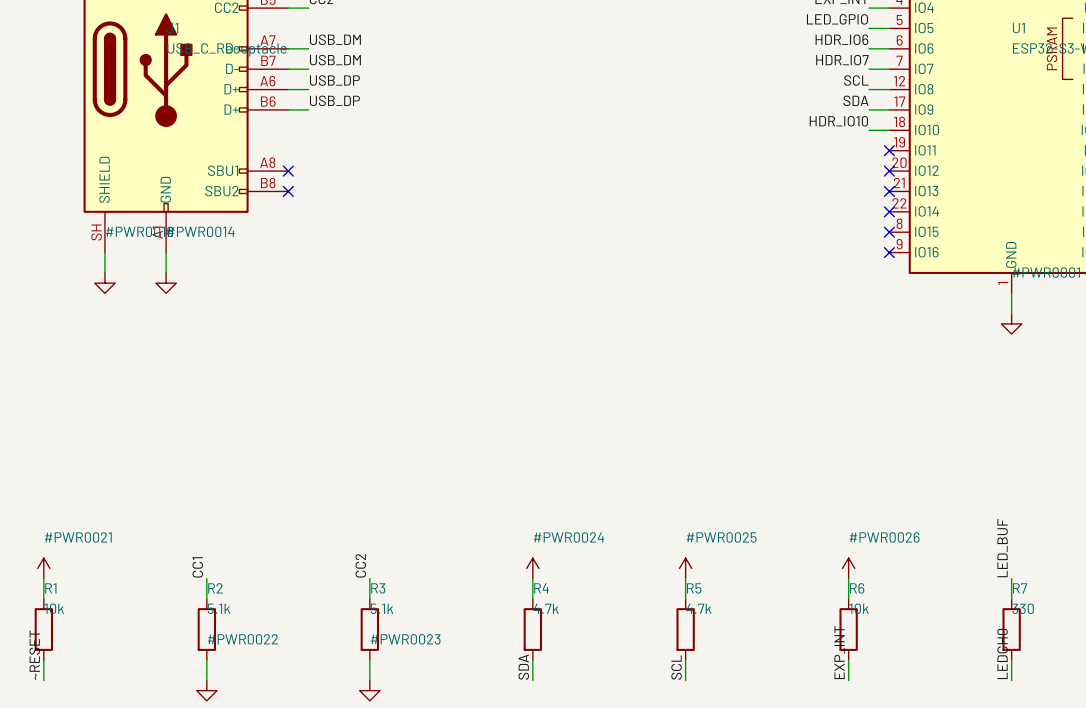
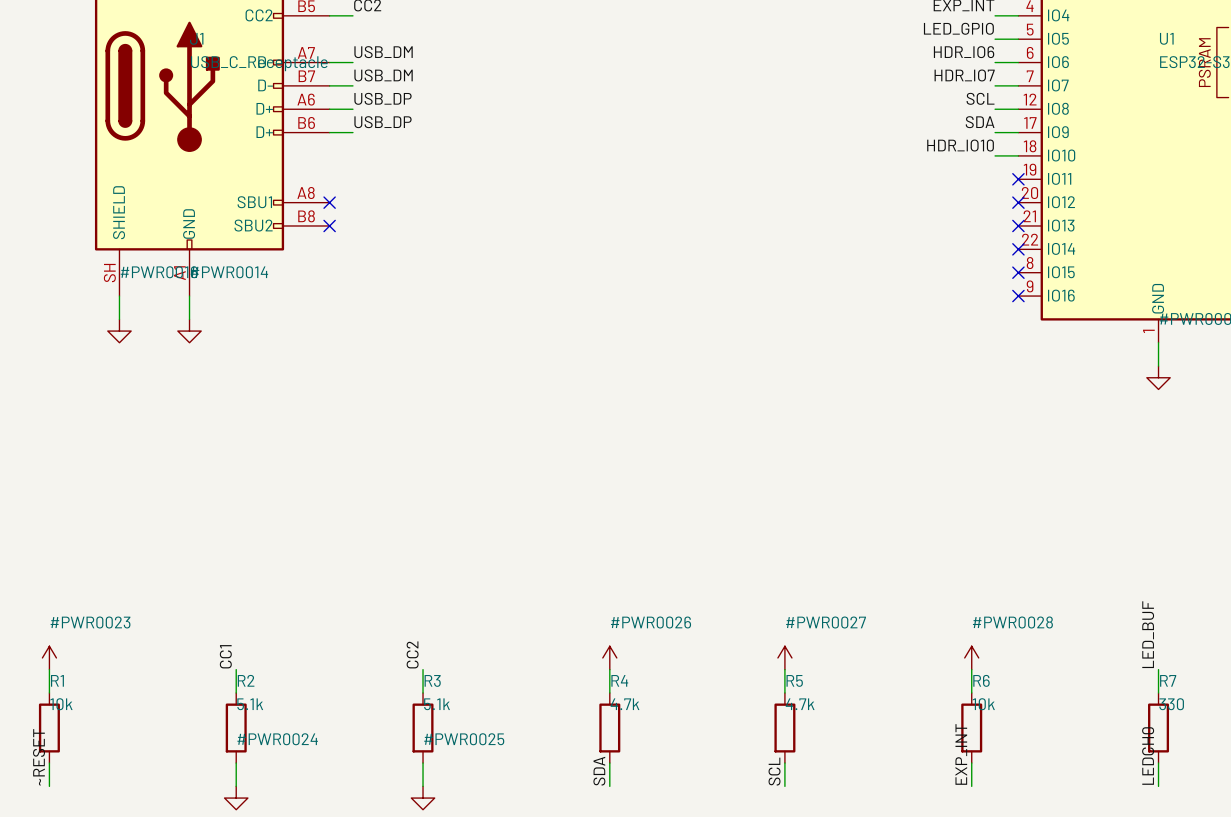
#PWR0021 name: #PWR0021 (78, 537) -> #PWR0023 (90, 622)
#PWR0024 name: #PWR0024 (568, 537) -> #PWR0026 (651, 622)
#PWR0025 name: #PWR0025 (721, 537) -> #PWR0027 (826, 622)
#PWR0026 name: #PWR0026 (884, 537) -> #PWR0028 (1012, 622)
#PWR0022 name: #PWR0022 (242, 639) -> #PWR0024 (277, 739)
#PWR0023 name: #PWR0023 (405, 639) -> #PWR0025 (464, 739)

